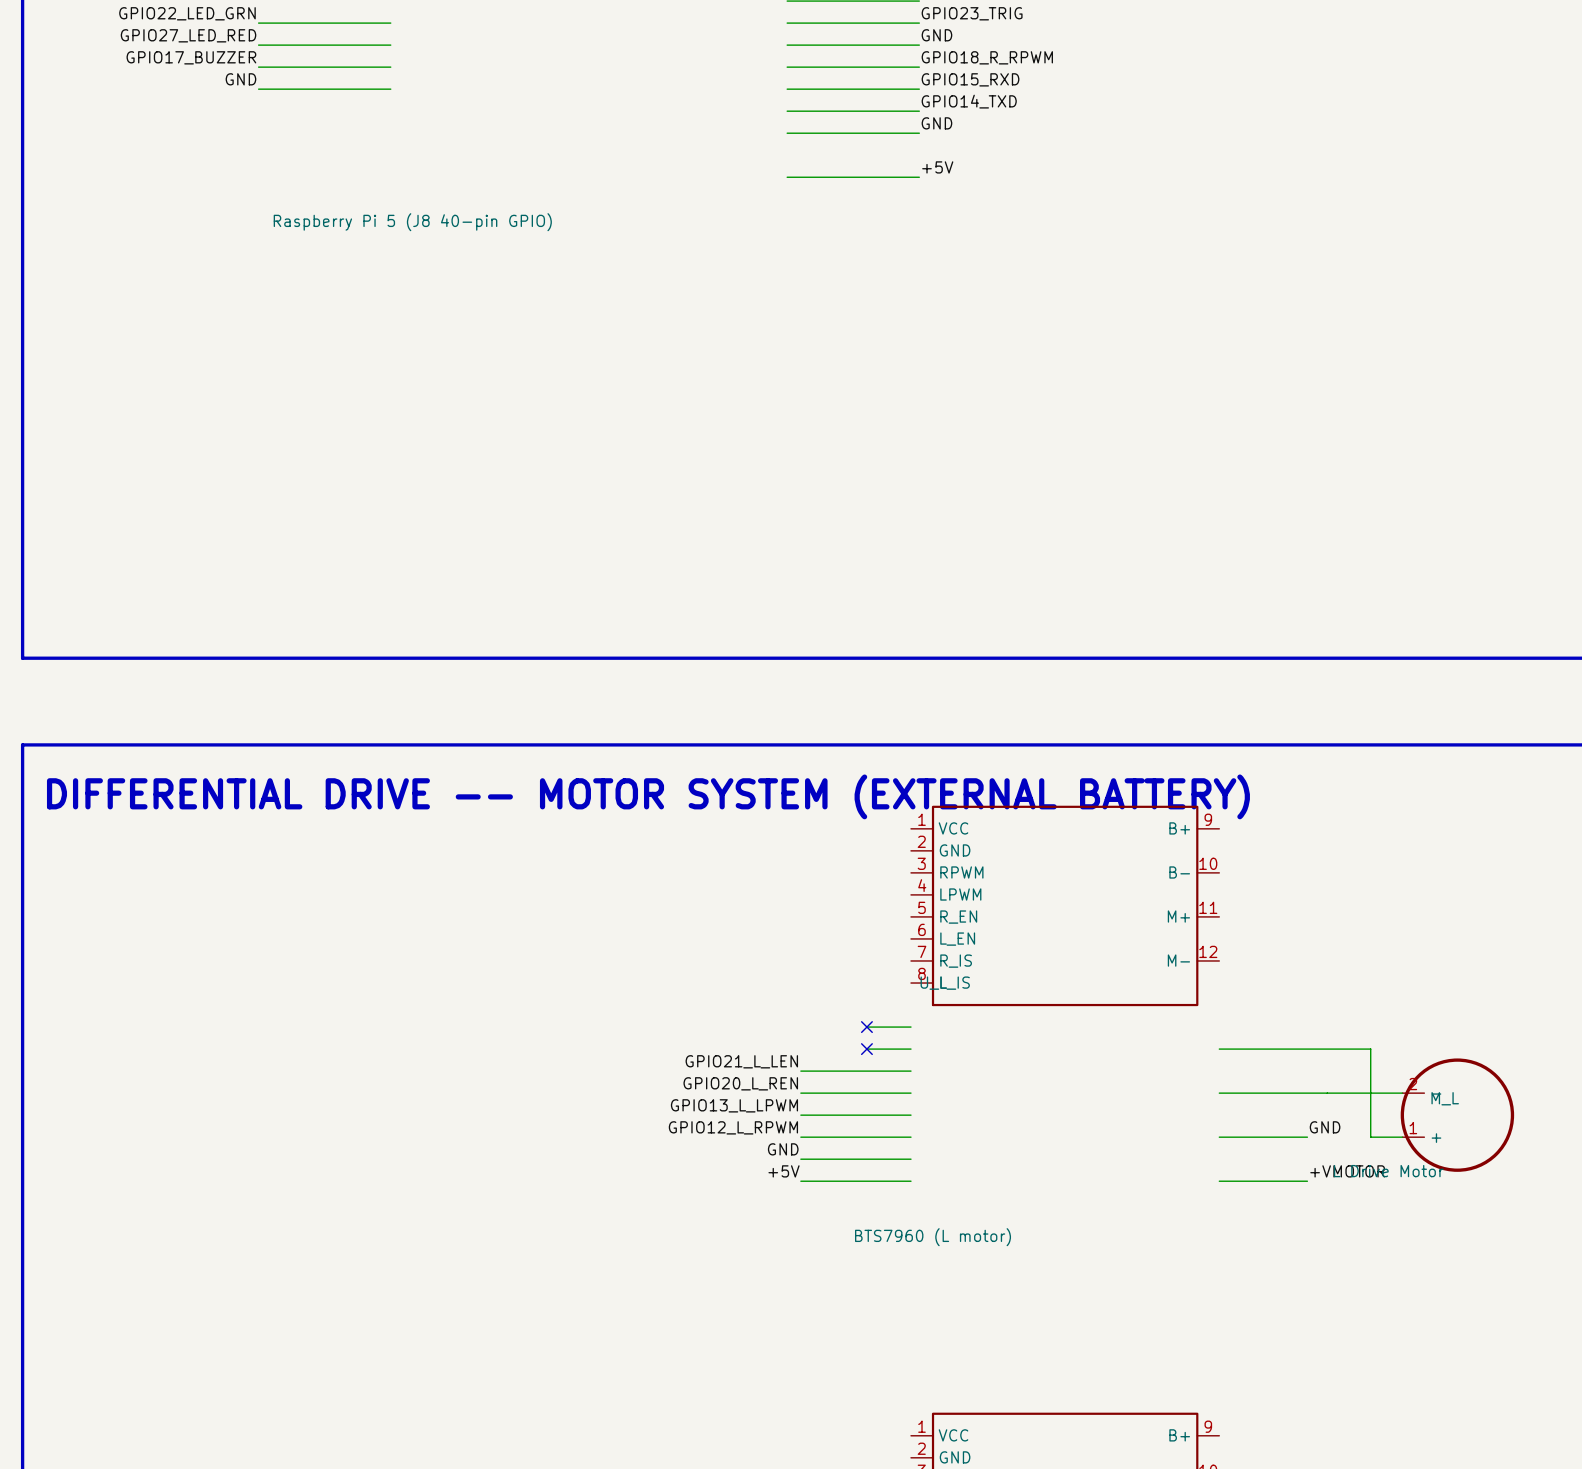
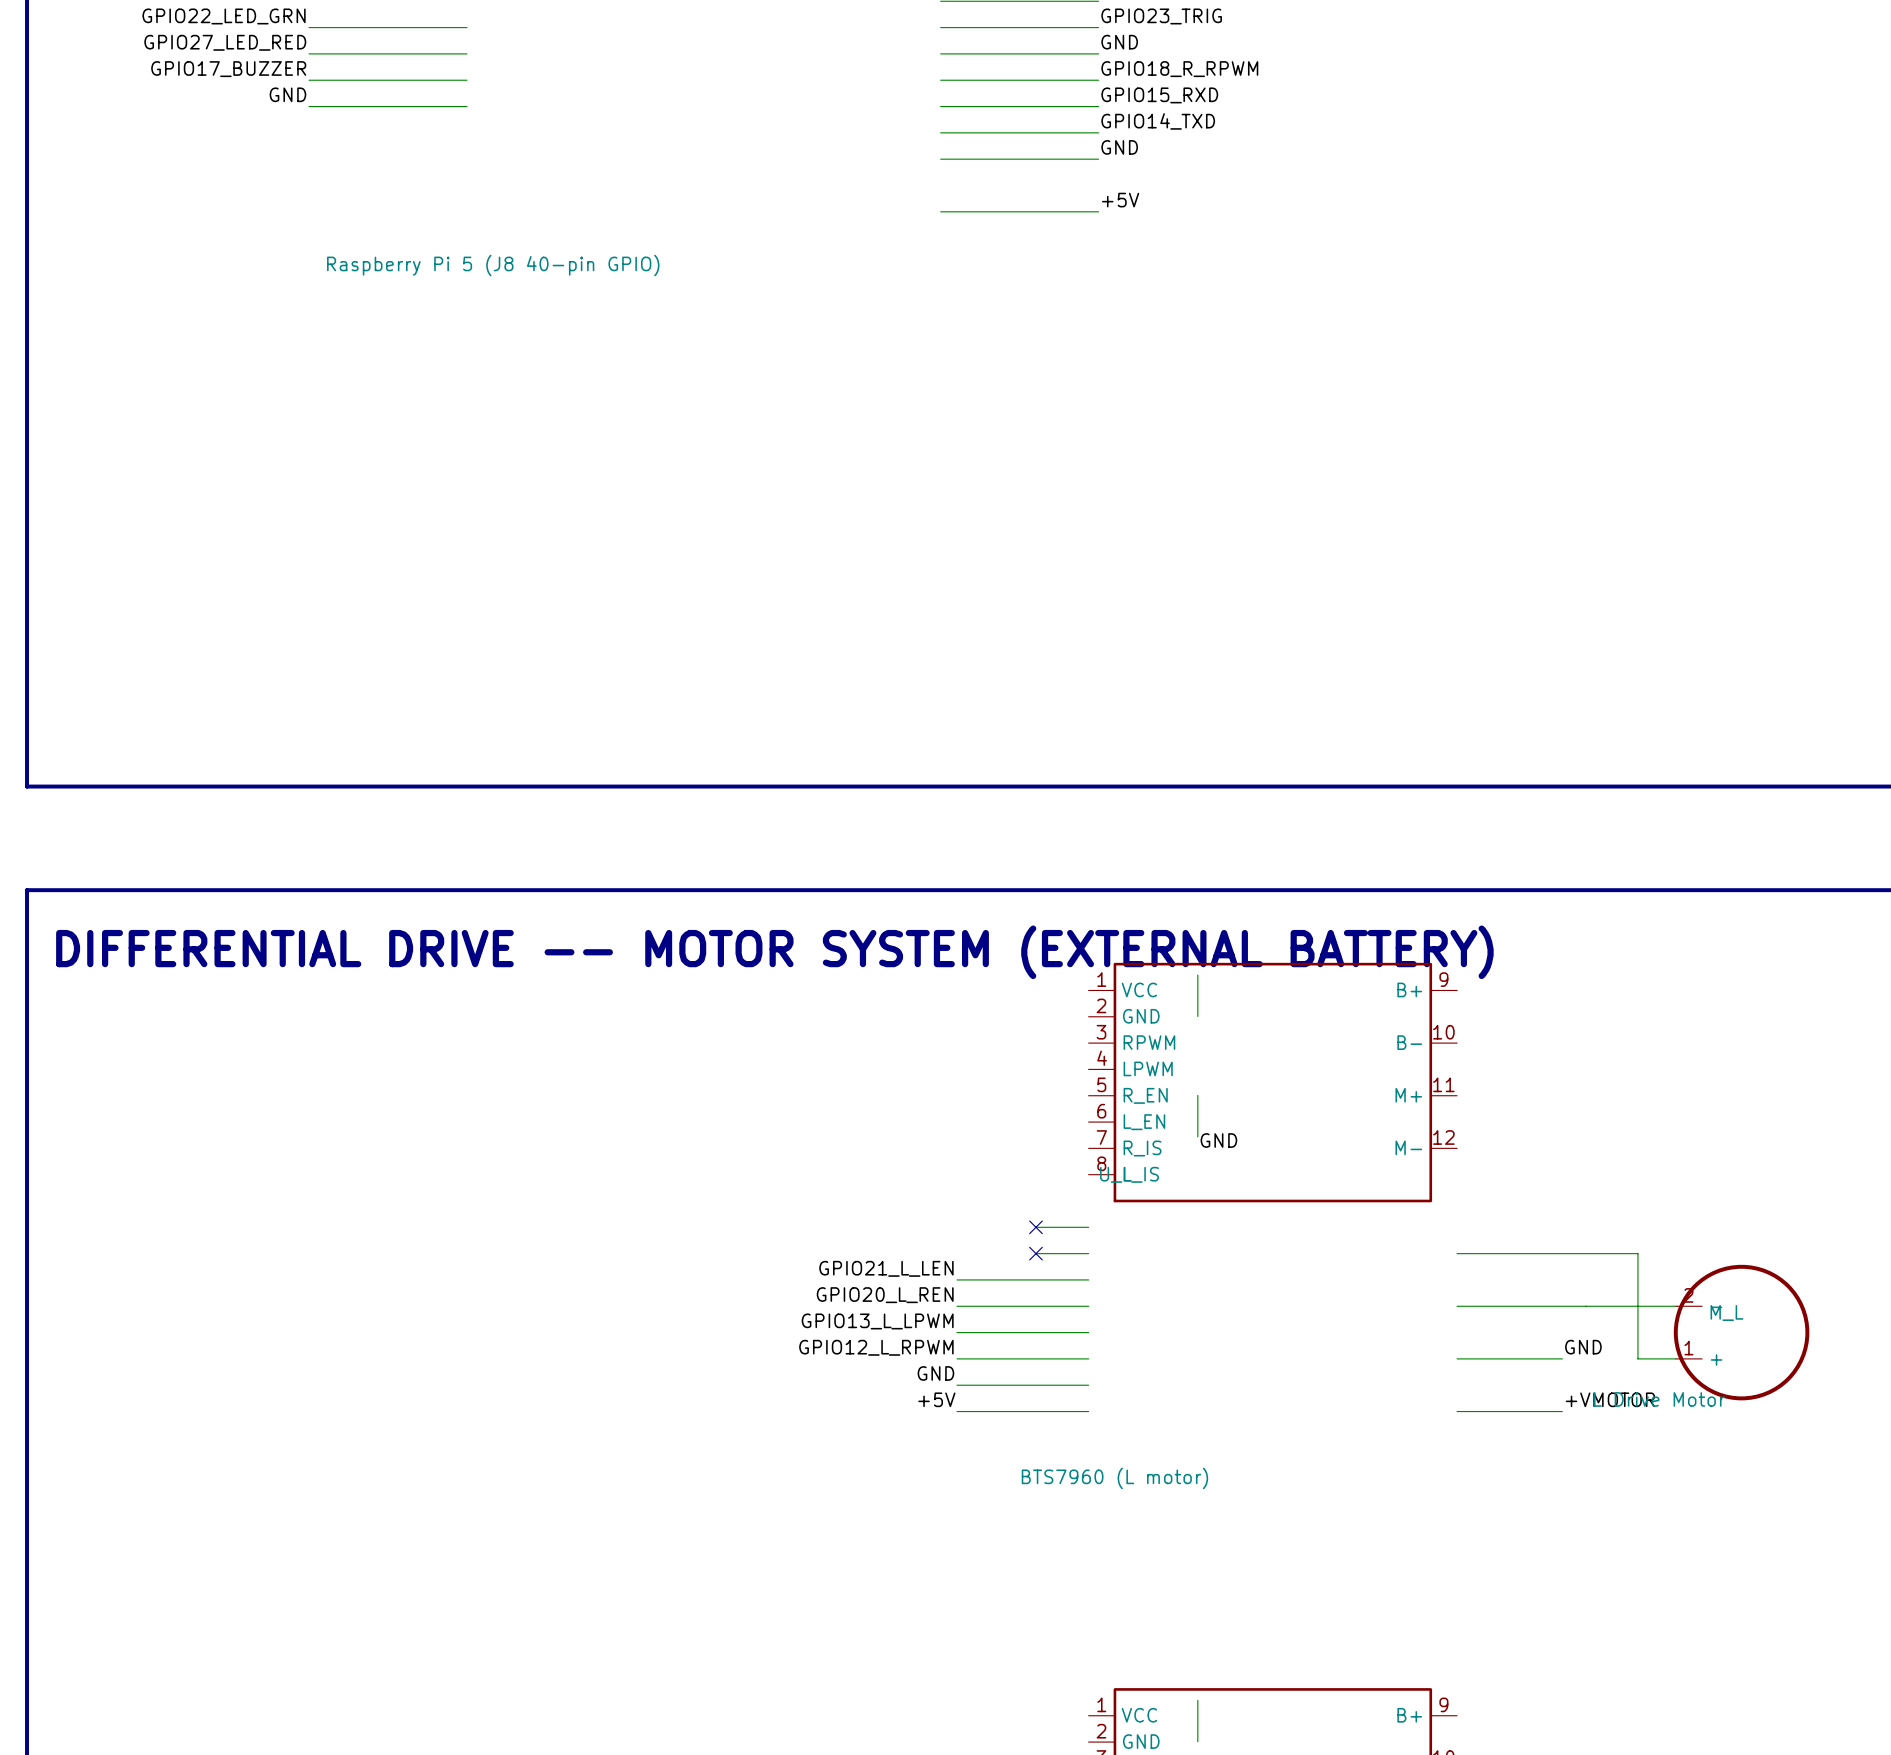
wire: none -> (1197, 975) (1197, 1016)
wire: none -> (1197, 1095) (1197, 1136)
label: none -> GND (1218, 1140)
wire: none -> (1197, 1700) (1197, 1741)

